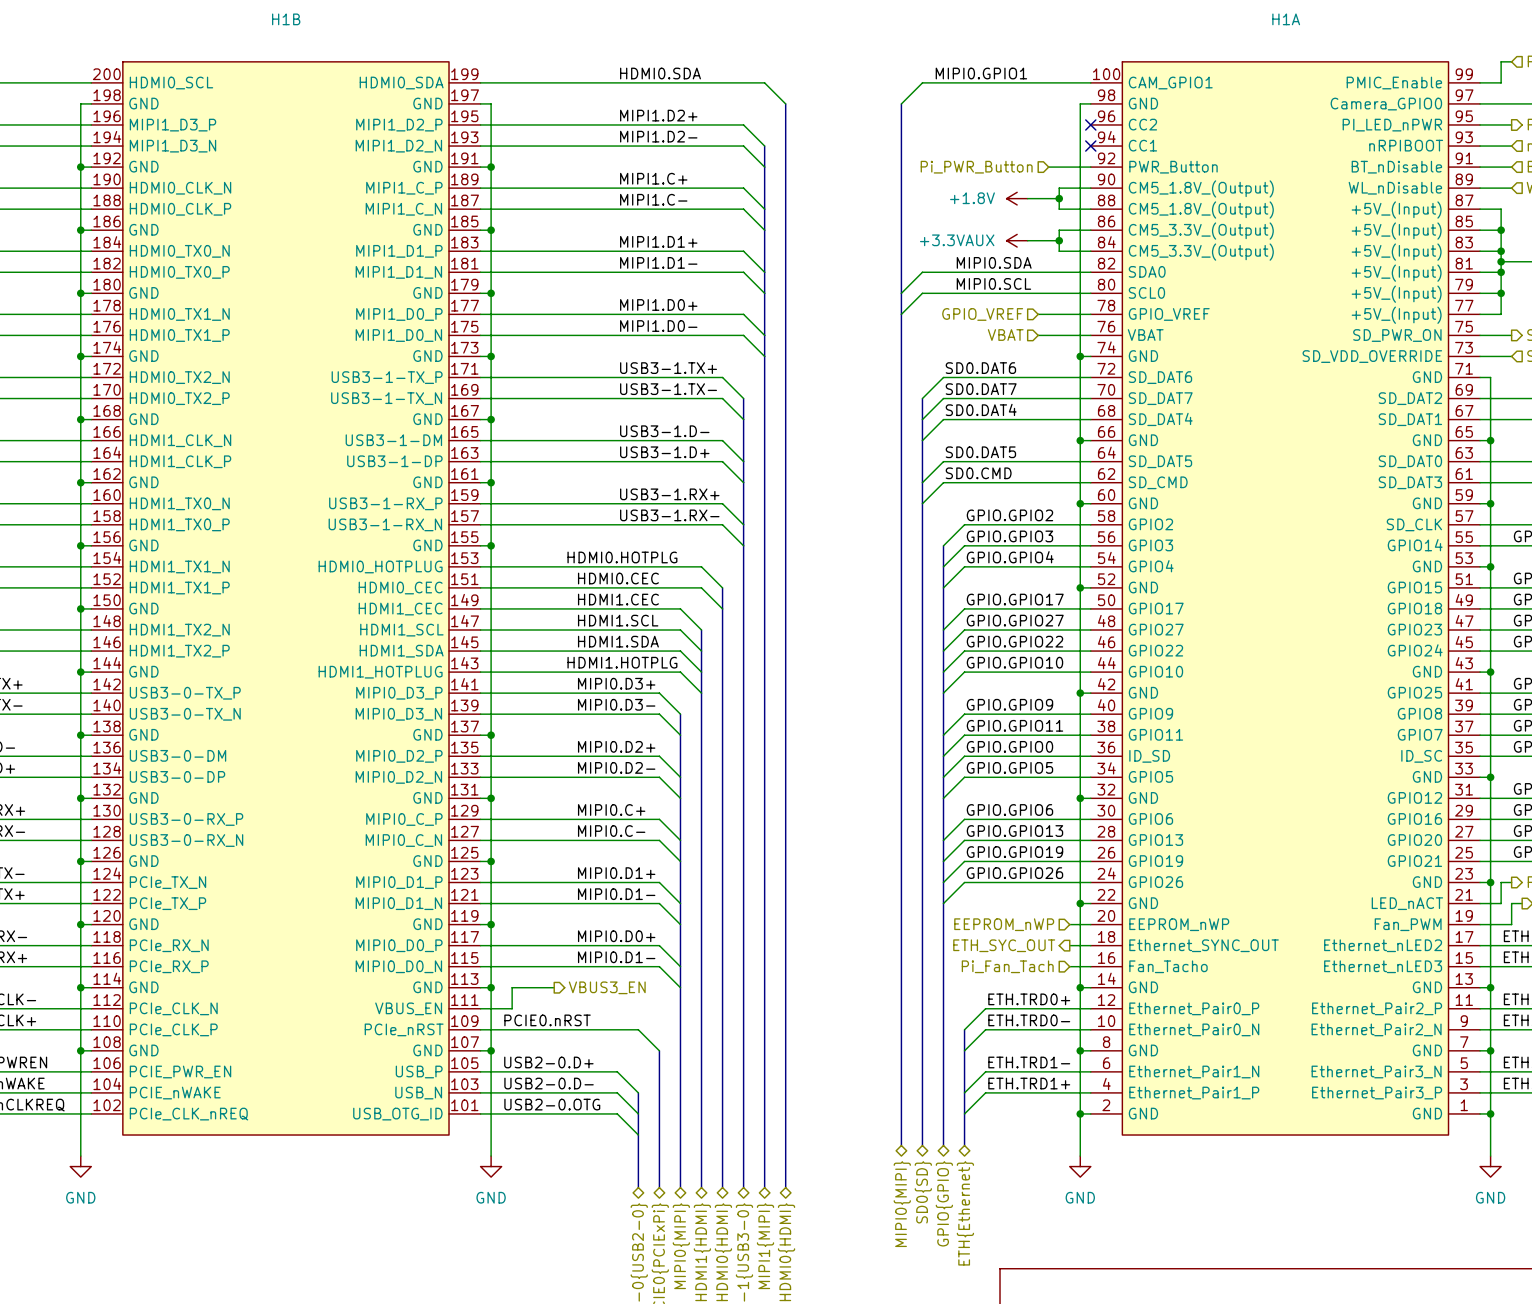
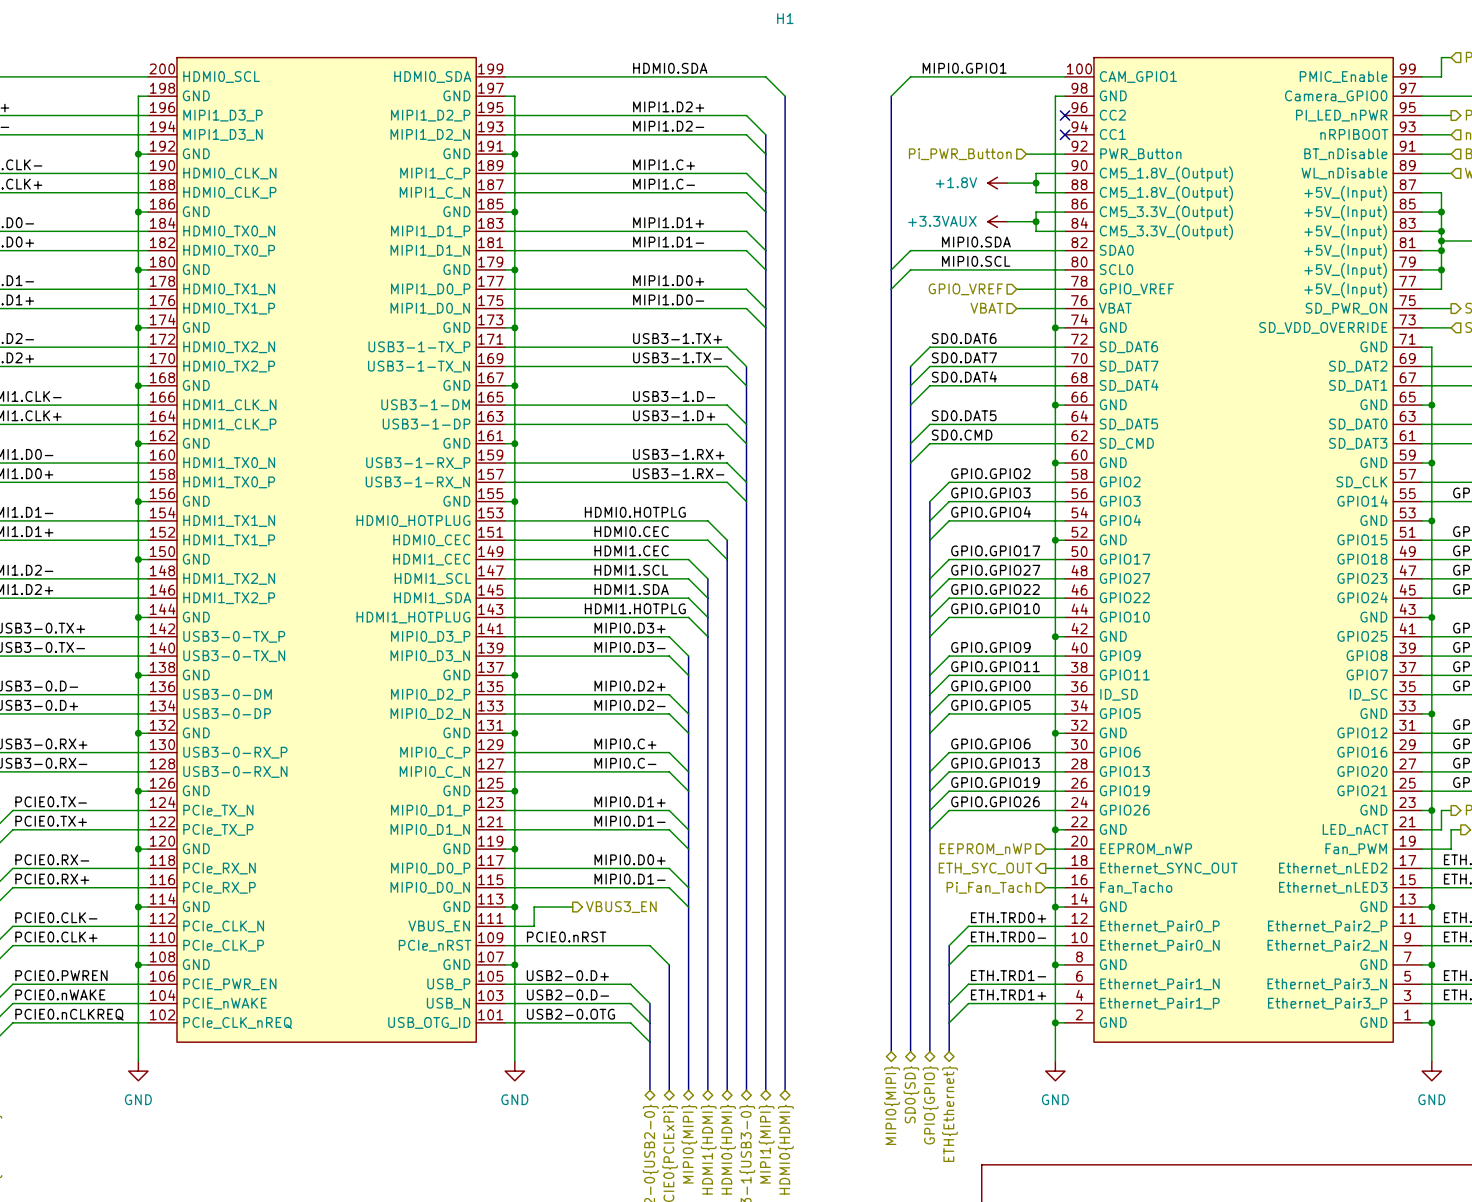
H1B: (285, 598) -> none
H1: none -> (785, 549)
H1A: (1285, 598) -> none

